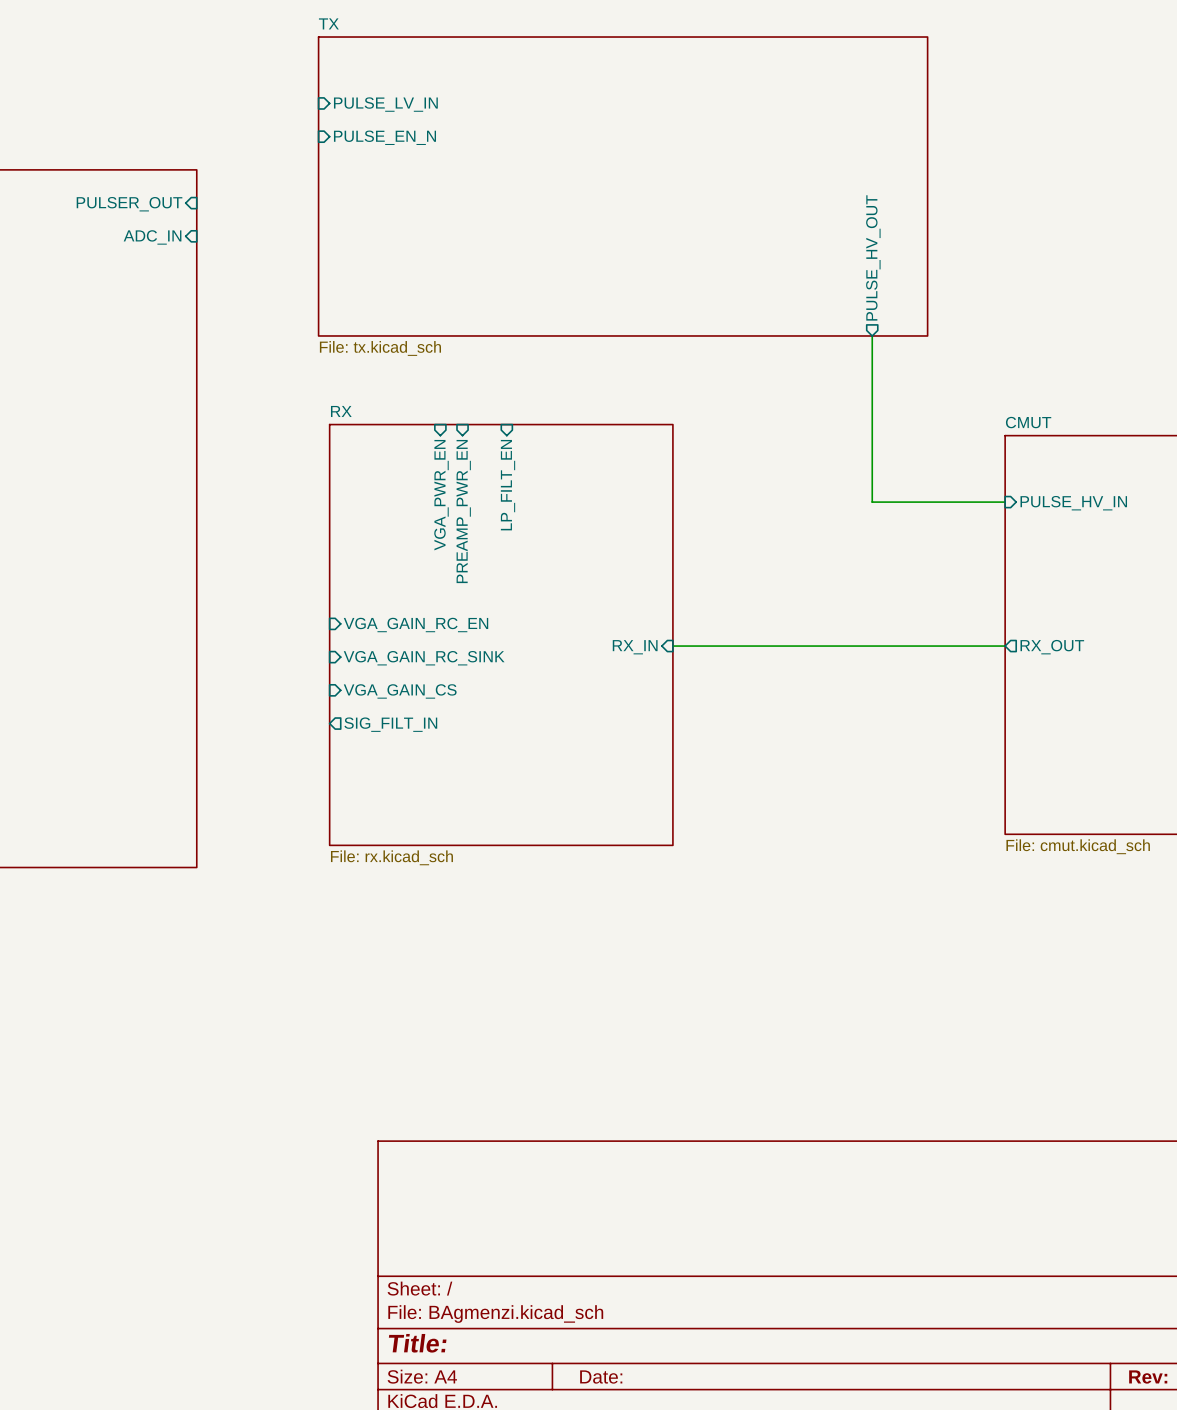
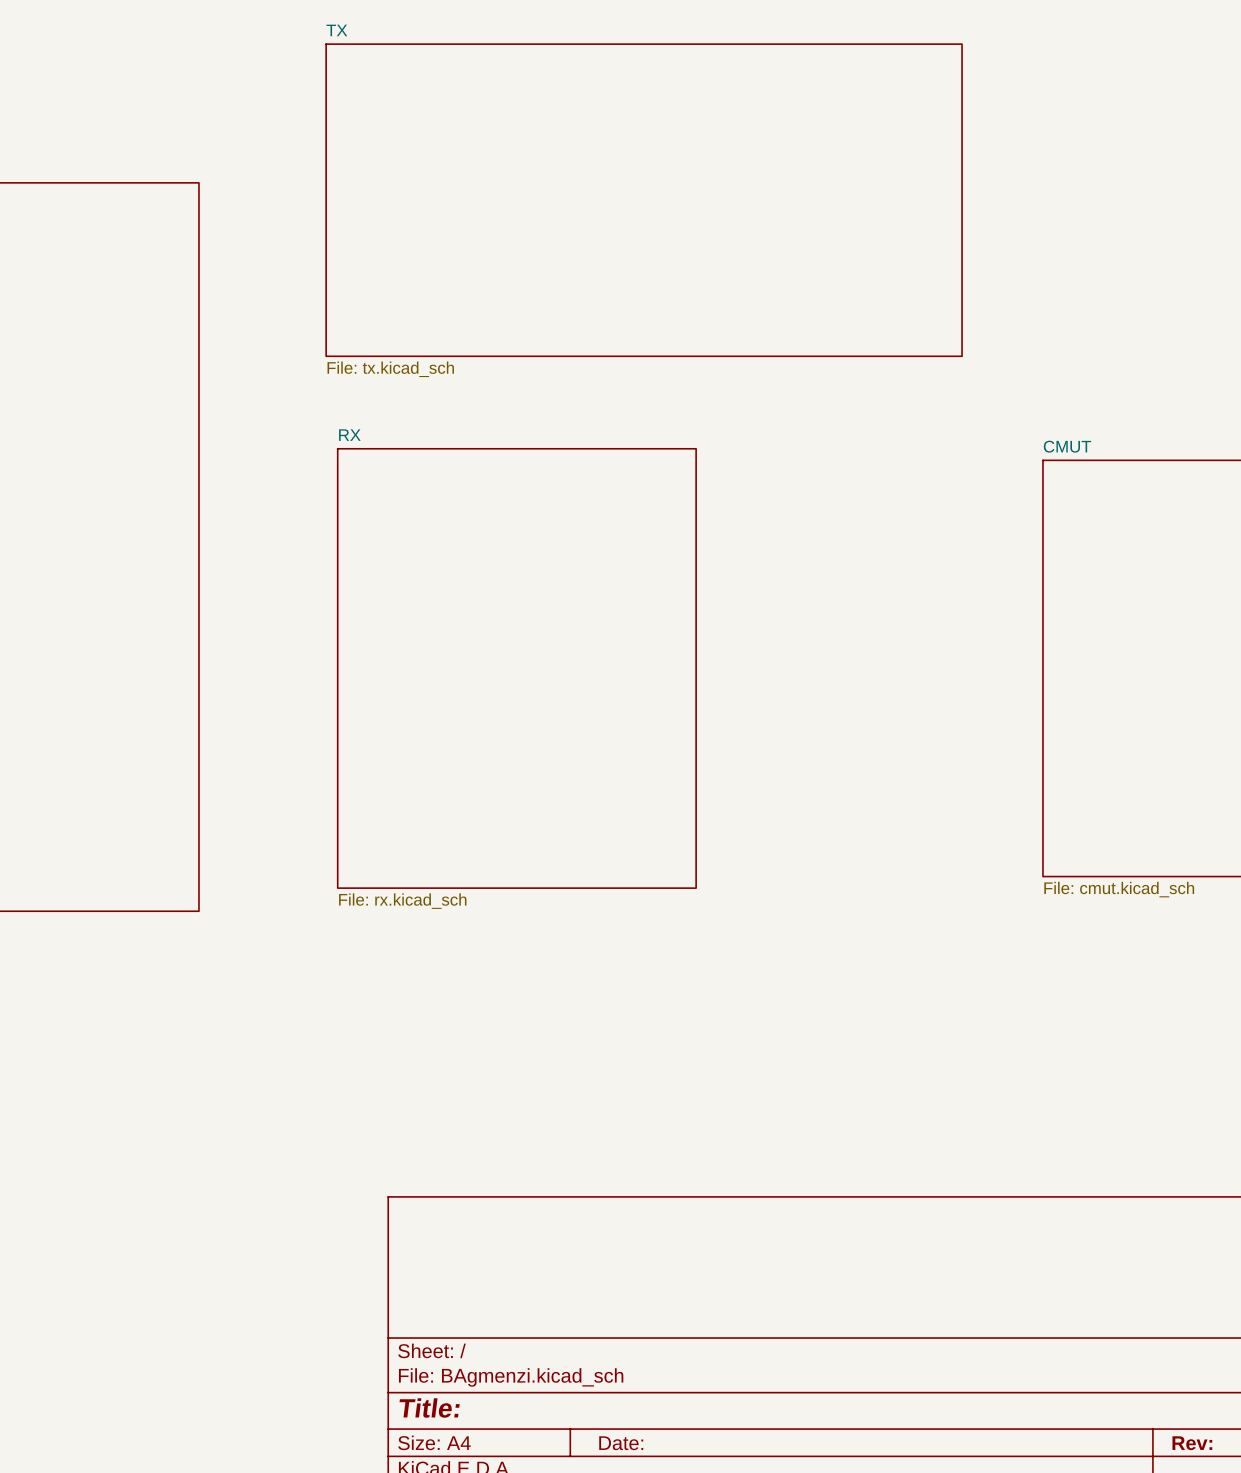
sheet pin: PULSE_LV_IN (385, 104) -> none
sheet pin: PULSE_EN_N (384, 137) -> none
sheet pin: PULSER_OUT (129, 204) -> none
sheet pin: ADC_IN (152, 237) -> none
sheet pin: PULSE_HV_OUT (873, 257) -> none
wire: (872, 335) (872, 502) (1005, 502) -> none
sheet pin: LP_FILT_EN (508, 485) -> none
sheet pin: VGA_PWR_EN (441, 495) -> none
sheet pin: PULSE_HV_IN (1073, 503) -> none
sheet pin: PREAMP_PWR_EN (463, 511) -> none
sheet pin: VGA_GAIN_RC_EN (416, 625) -> none
wire: (672, 646) (1005, 646) -> none
sheet pin: RX_IN (635, 647) -> none
sheet pin: RX_OUT (1052, 647) -> none
sheet pin: VGA_GAIN_RC_SINK (424, 658) -> none
sheet pin: VGA_GAIN_CS (400, 691) -> none
sheet pin: SIG_FILT_IN (390, 724) -> none

